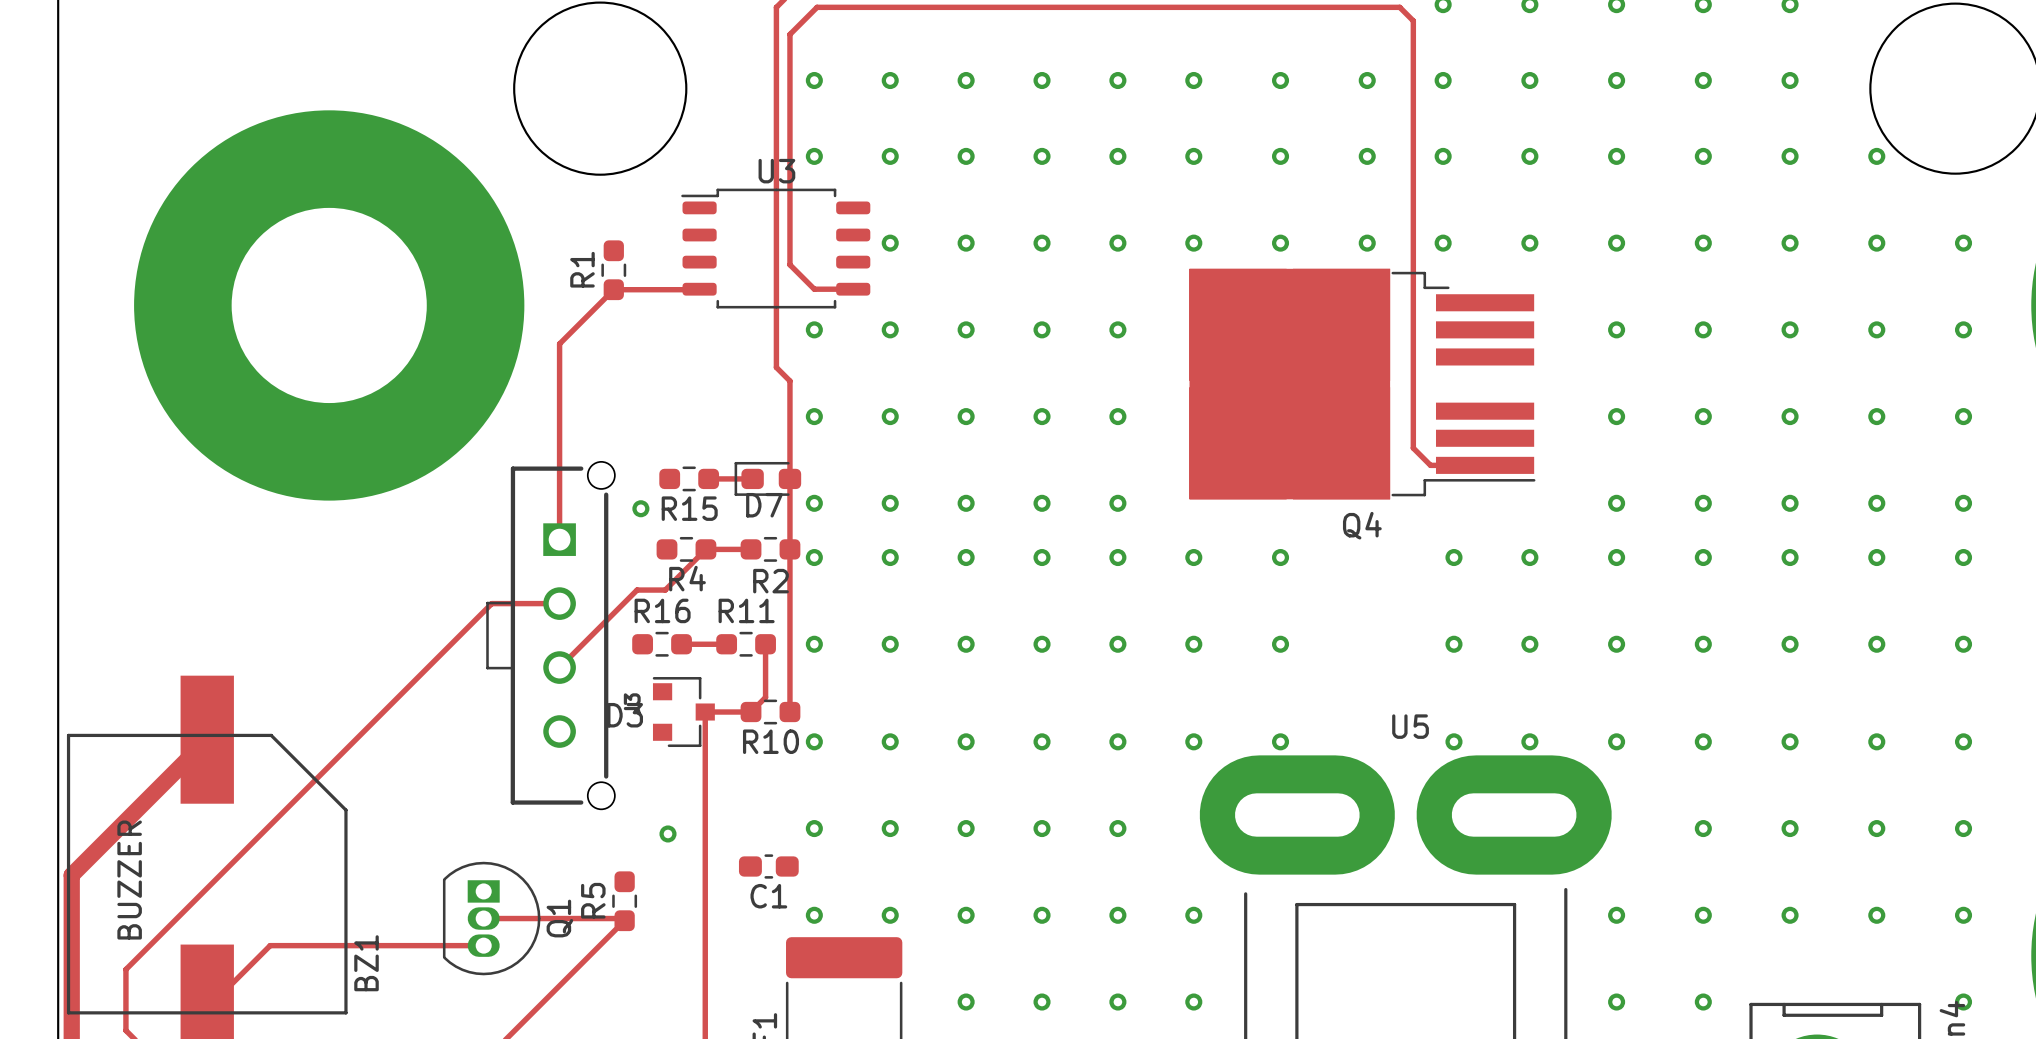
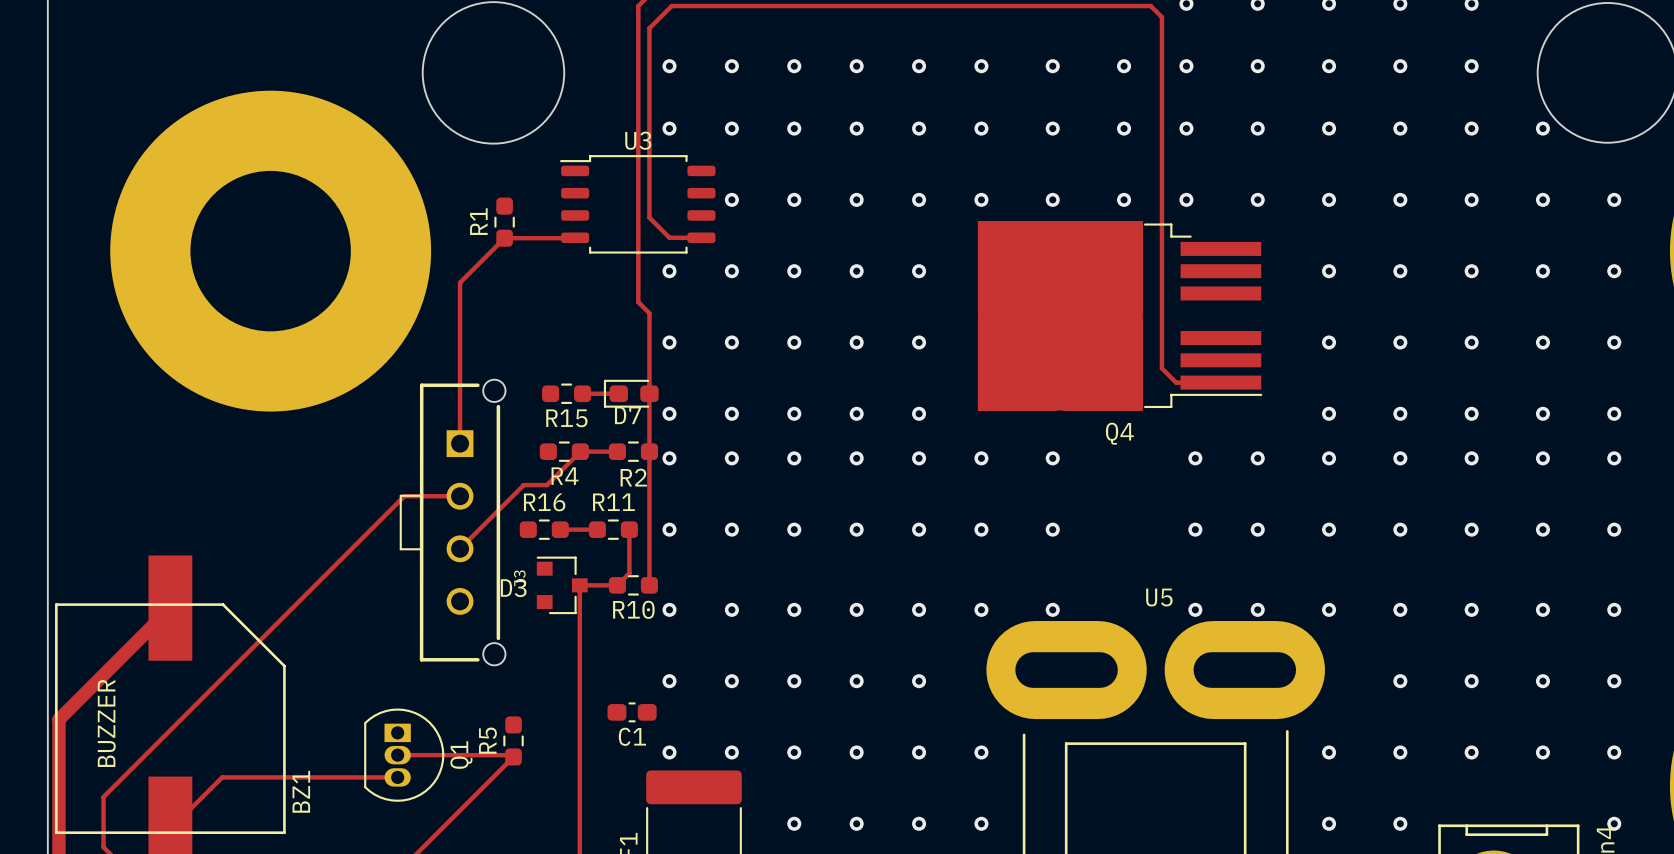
via: (640, 508) -> none
via: (668, 833) -> none

